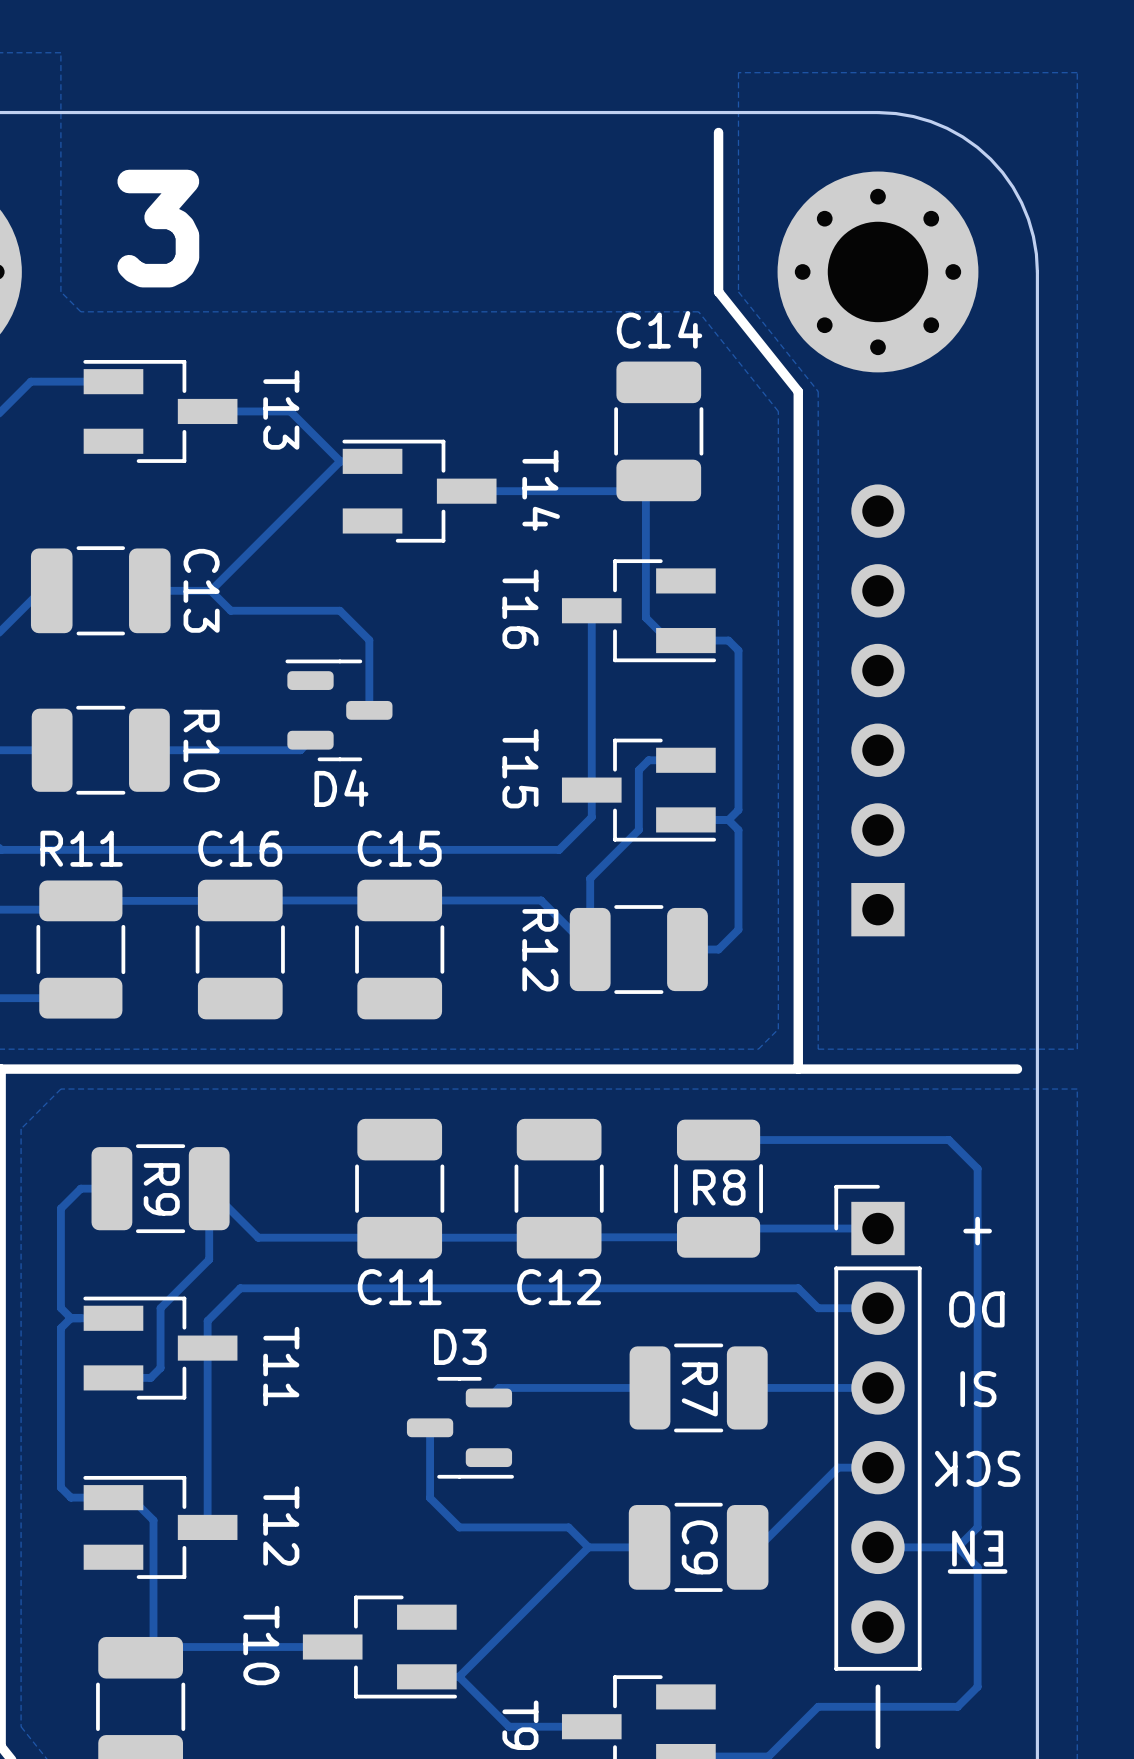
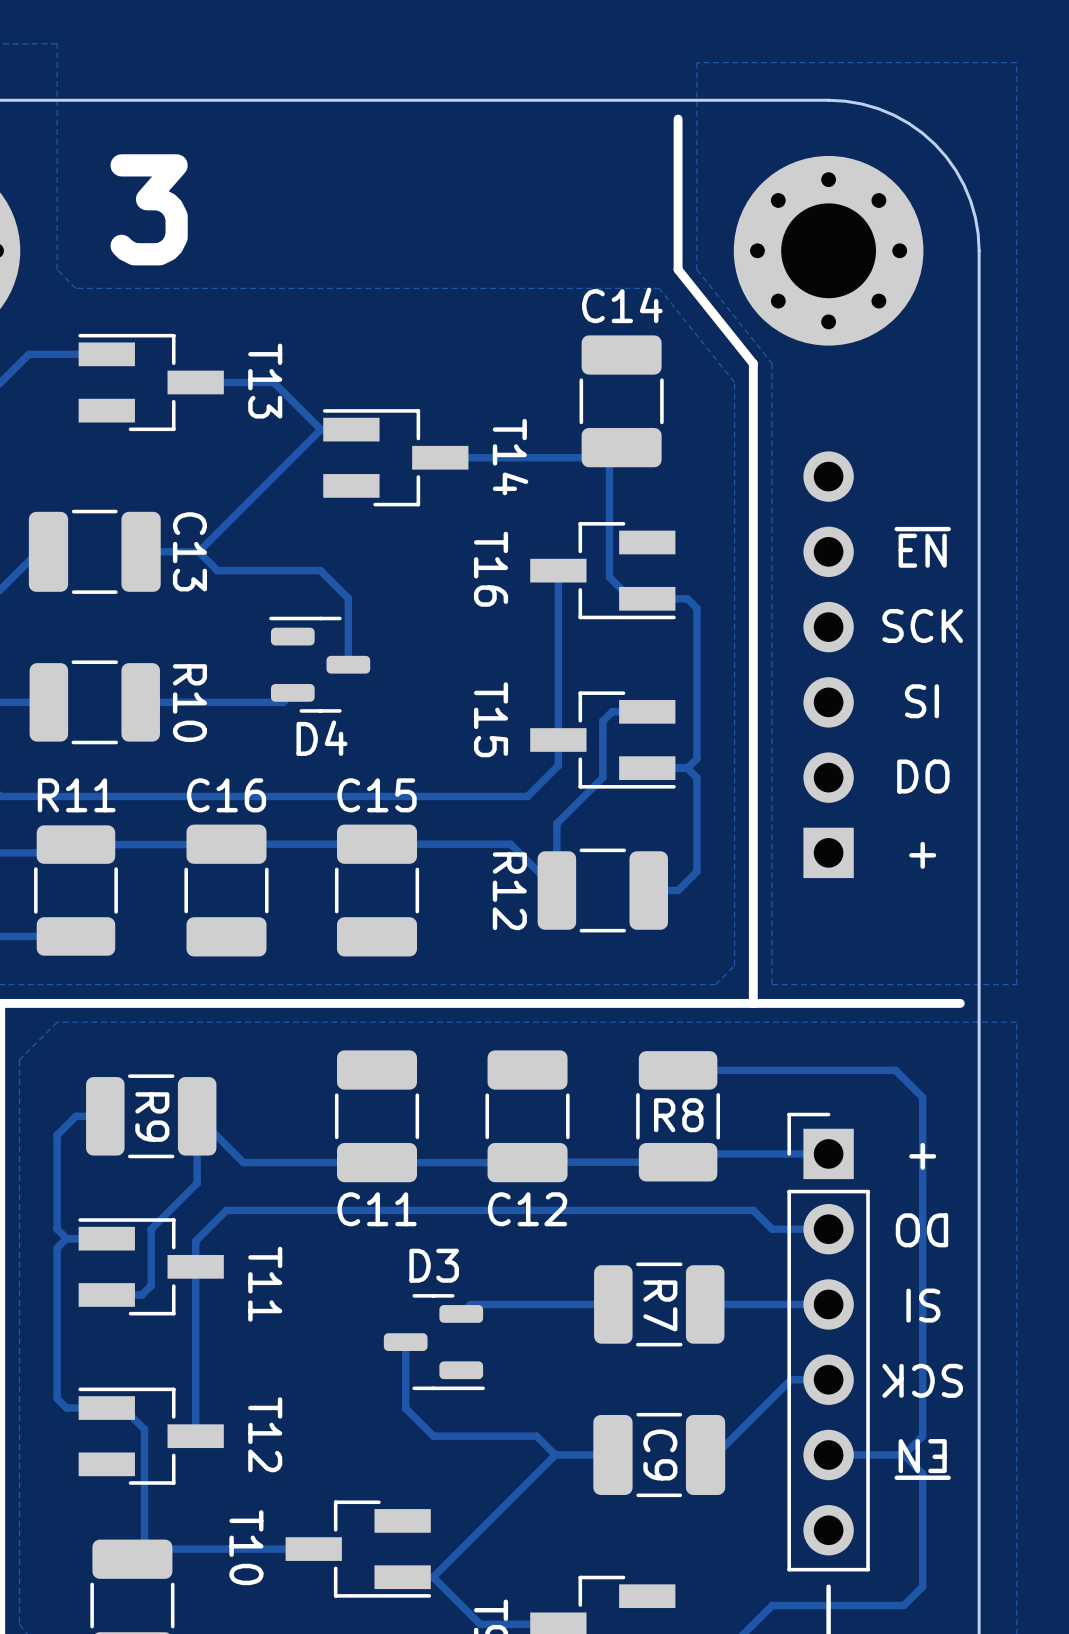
text: none -> ~{EN} (922, 547)
text: none -> SCK (922, 625)
text: none -> SI (921, 701)
text: none -> DO (923, 776)
text: none -> + (922, 855)

